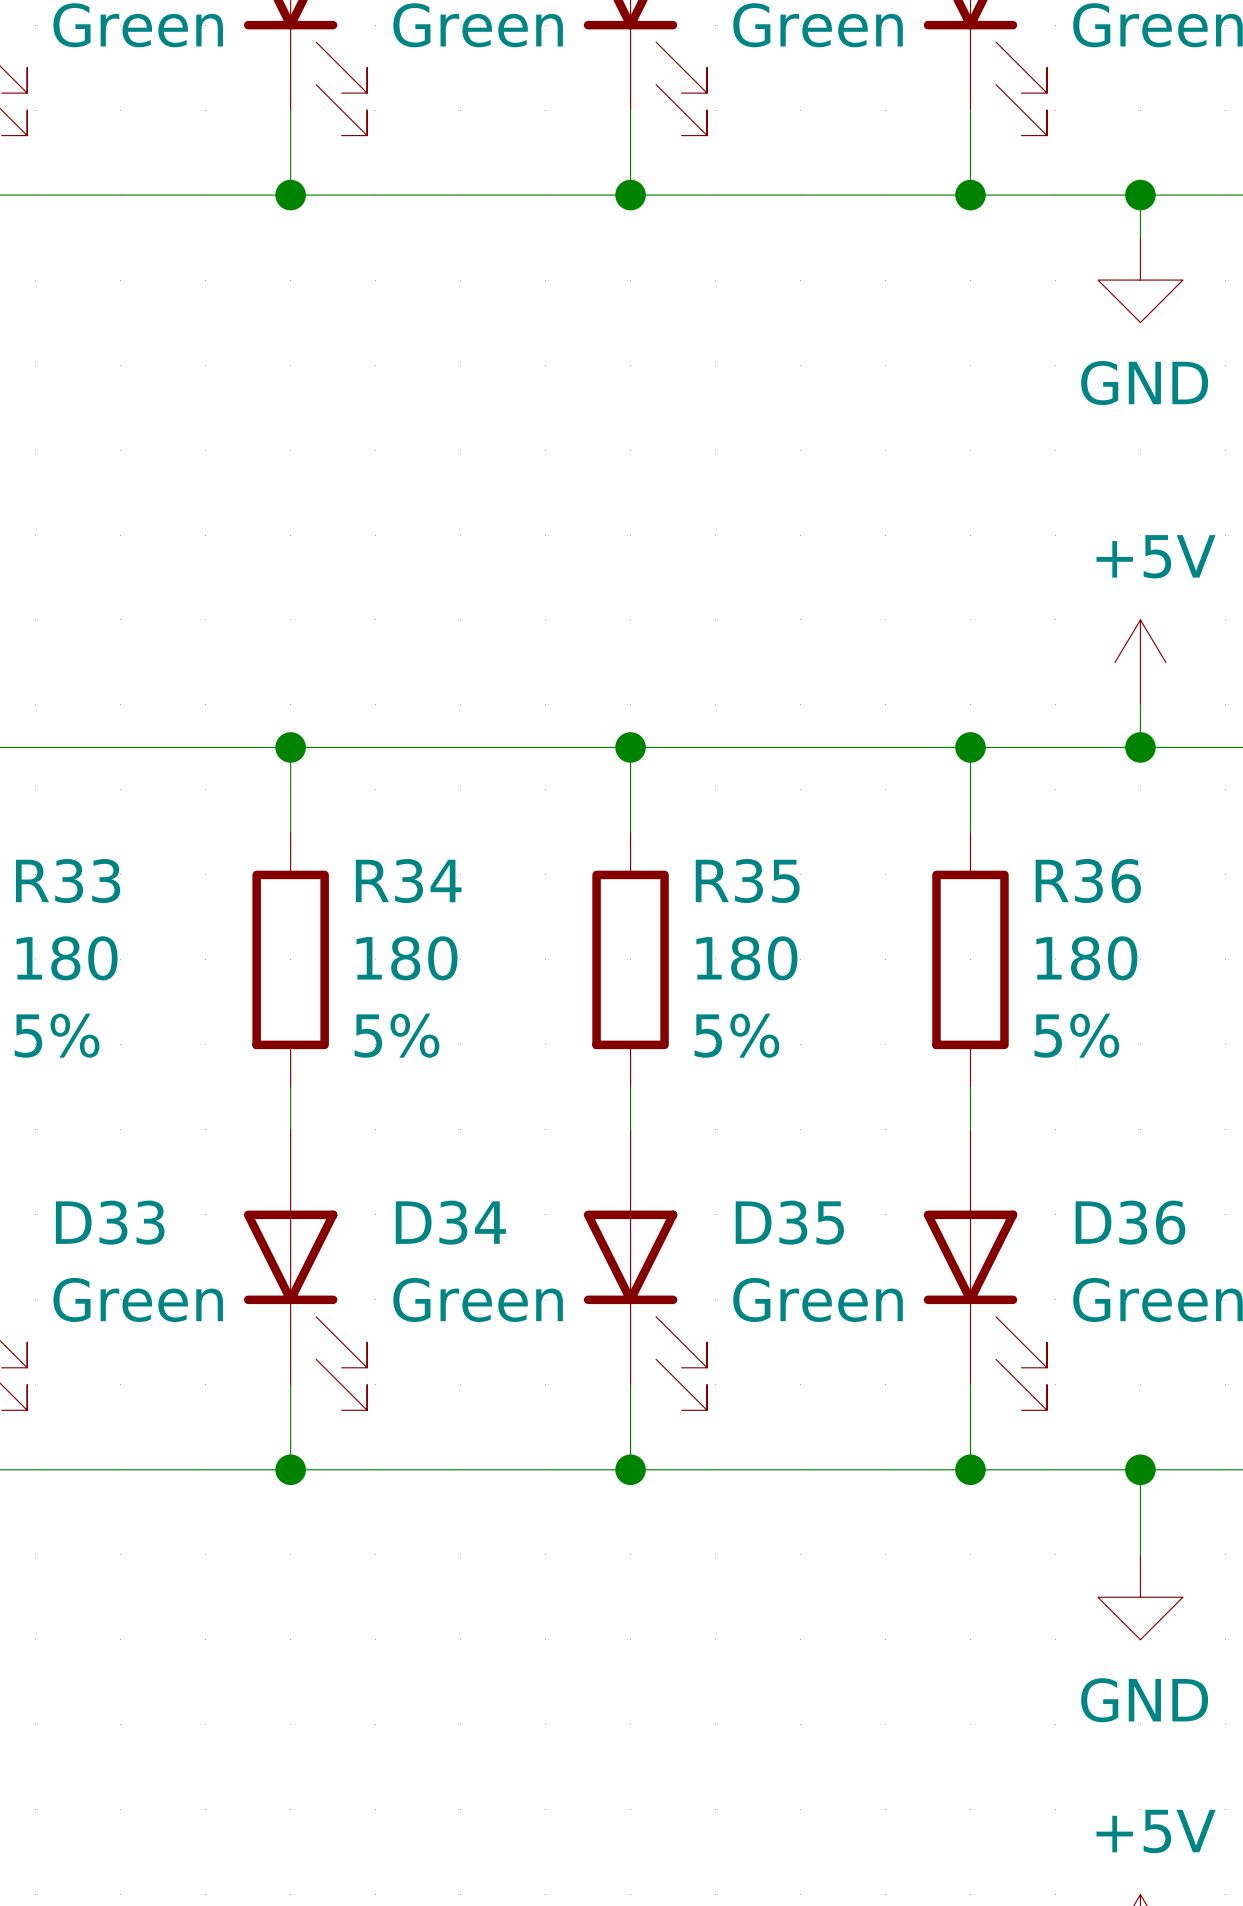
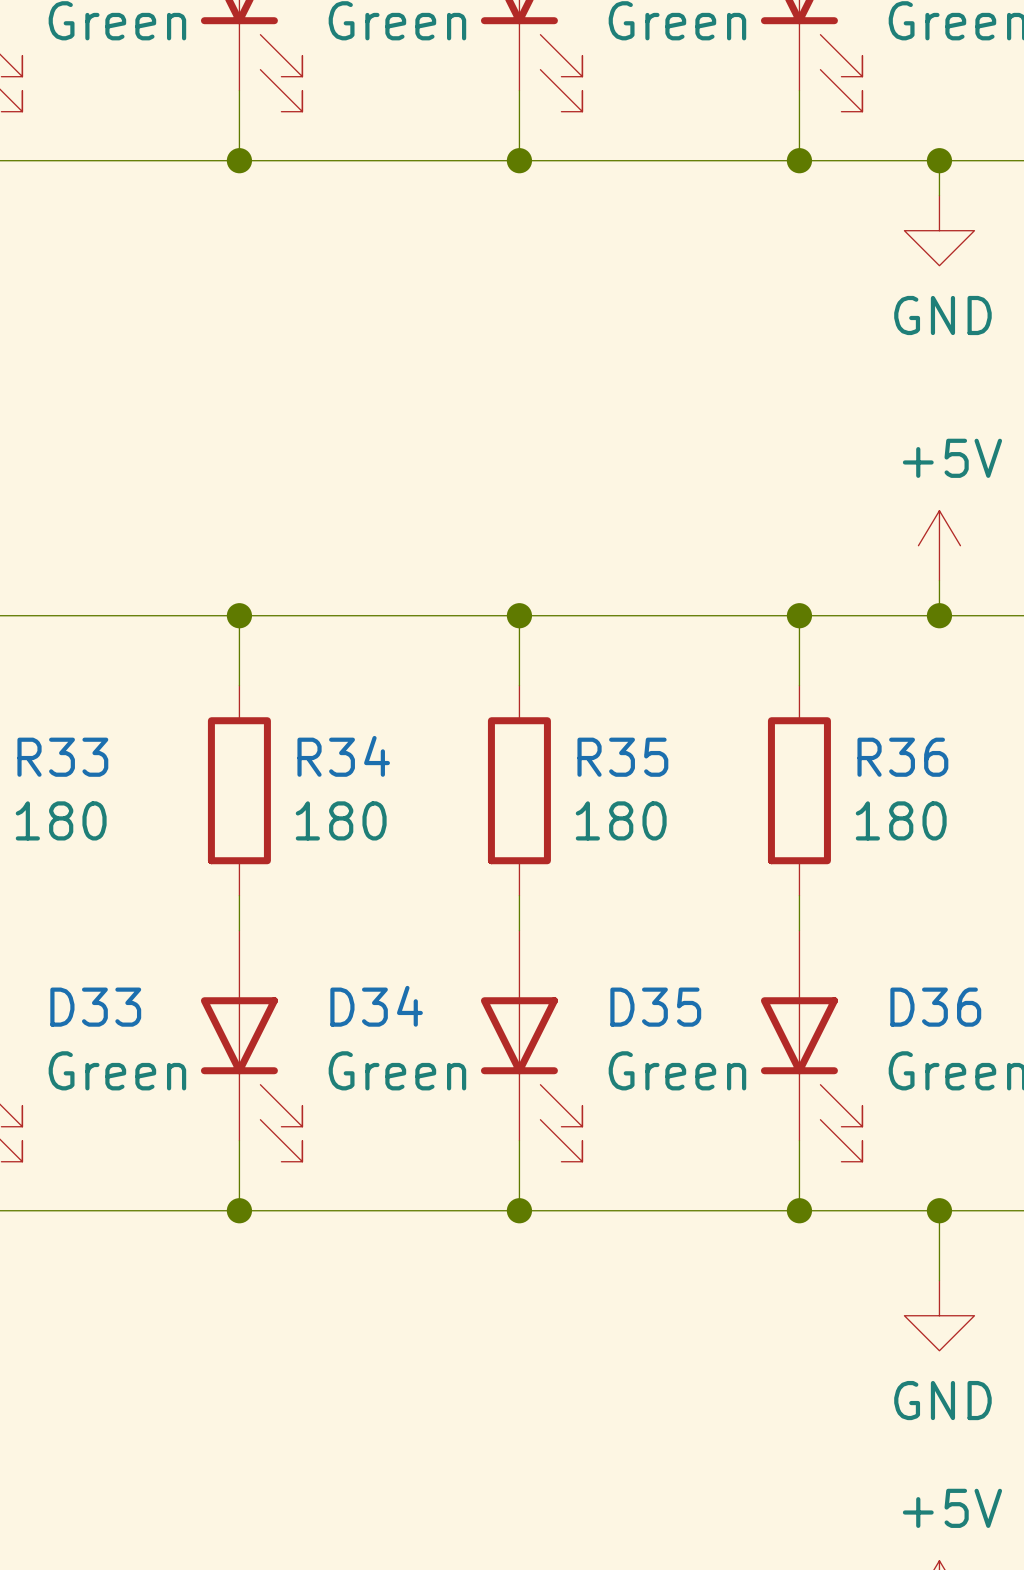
R33 name position: R33 (68, 881) -> R33 (62, 757)
R34 name position: R34 (408, 881) -> R34 (343, 756)
R35 name position: R35 (747, 881) -> R35 (622, 757)
R36 name position: R36 (1088, 881) -> R36 (902, 757)
R33 value position: 180 (67, 958) -> 180 (61, 820)
R34 value position: 180 (407, 958) -> 180 (341, 820)
R35 value position: 180 (746, 958) -> 180 (621, 820)
R36 value position: 180 (1086, 958) -> 180 (901, 820)
R33 text: 5% (57, 1035) -> none
R34 text: 5% (397, 1035) -> none
R35 text: 5% (736, 1035) -> none
R36 text: 5% (1076, 1035) -> none

